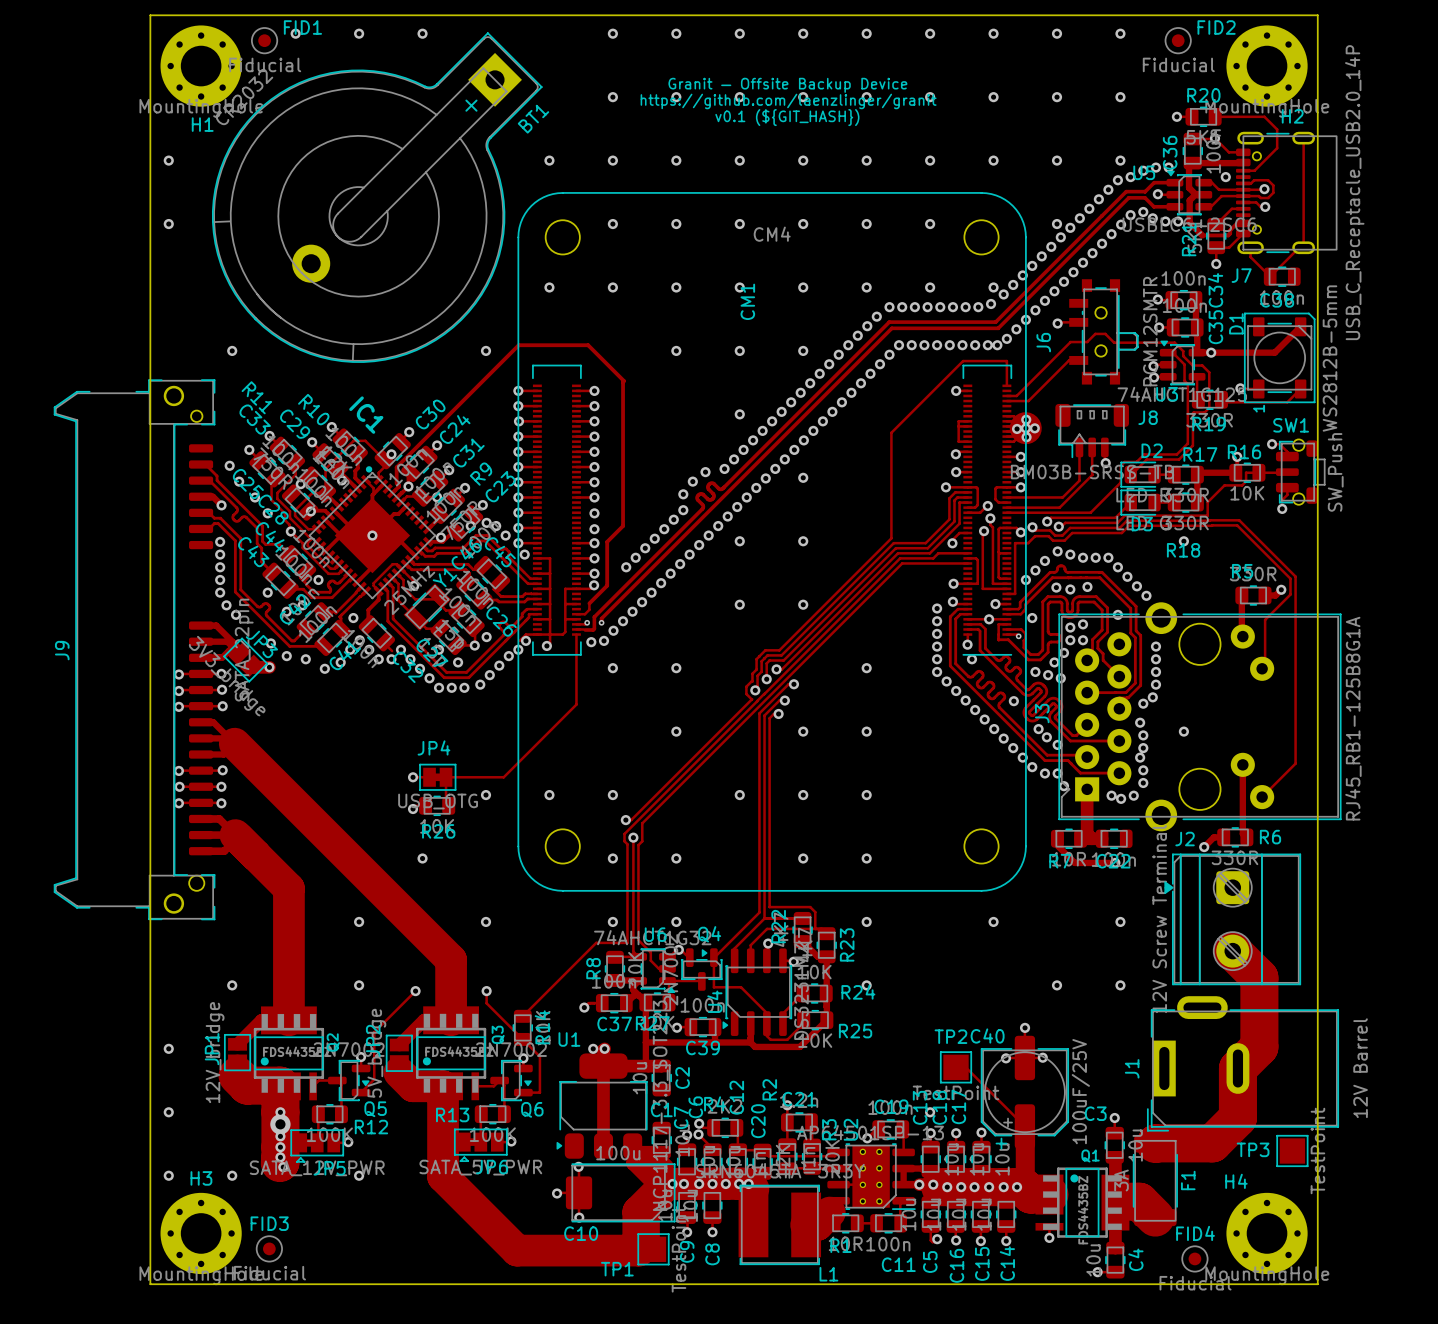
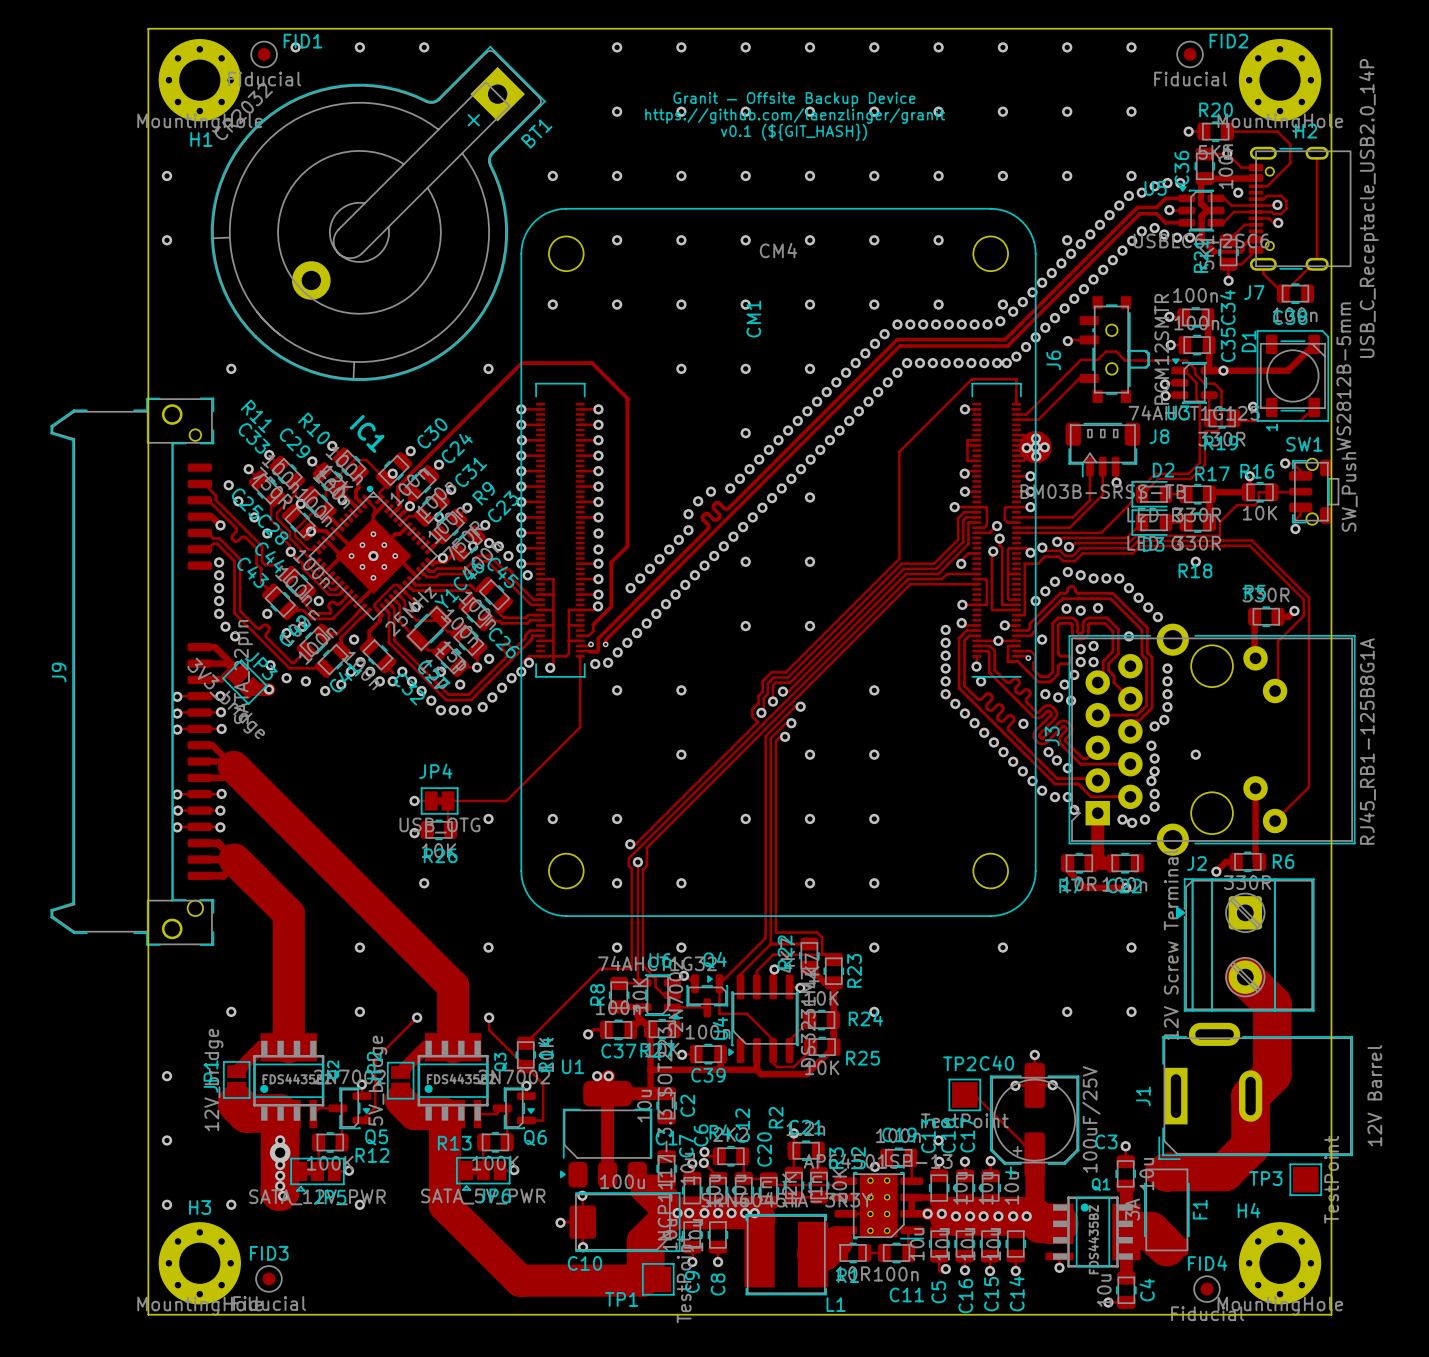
via: none -> (373, 534)
via: none -> (362, 545)
via: none -> (384, 545)
via: none -> (351, 555)
via: none -> (395, 555)
via: none -> (362, 566)
via: none -> (384, 566)
via: none -> (373, 577)

